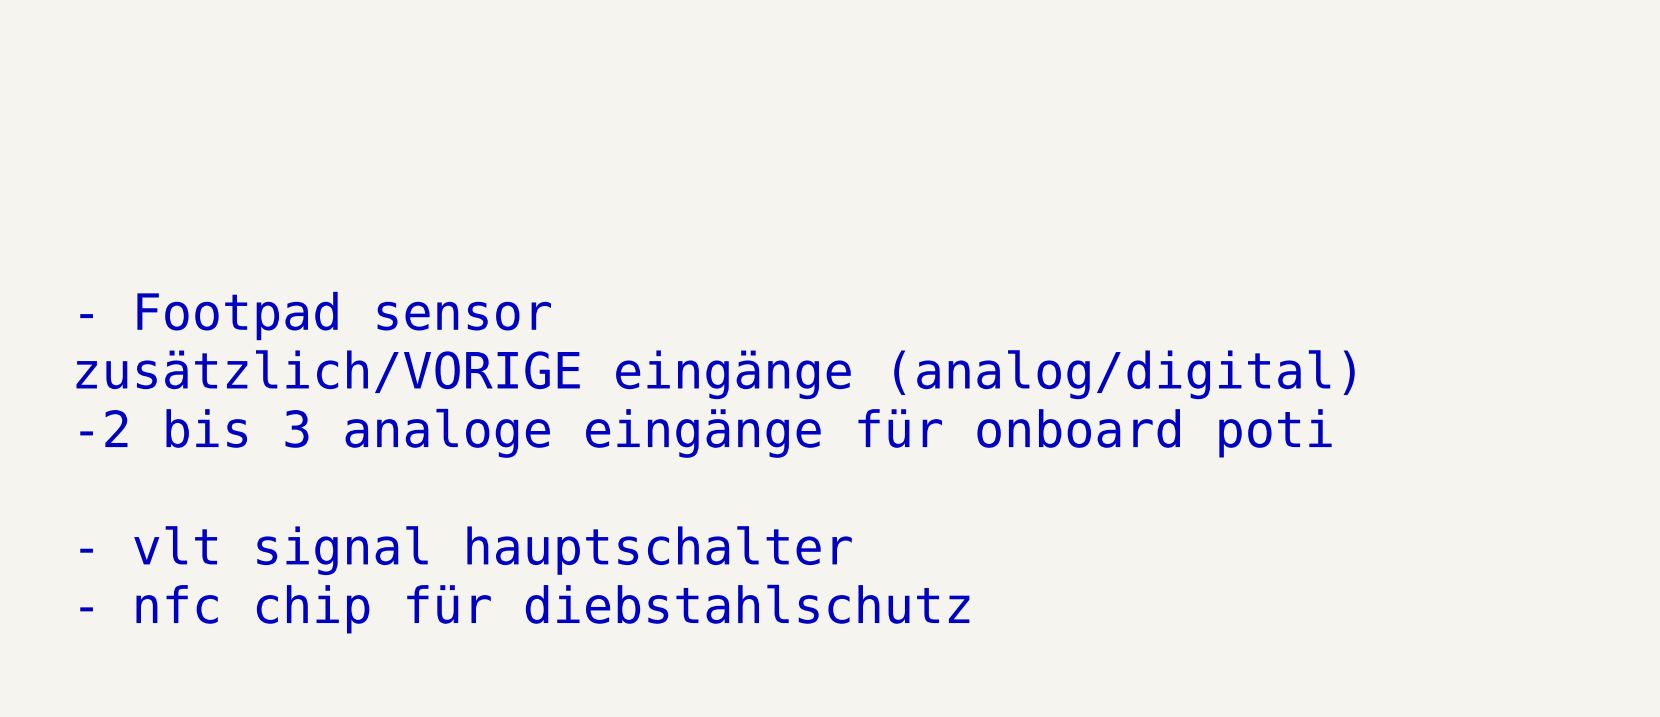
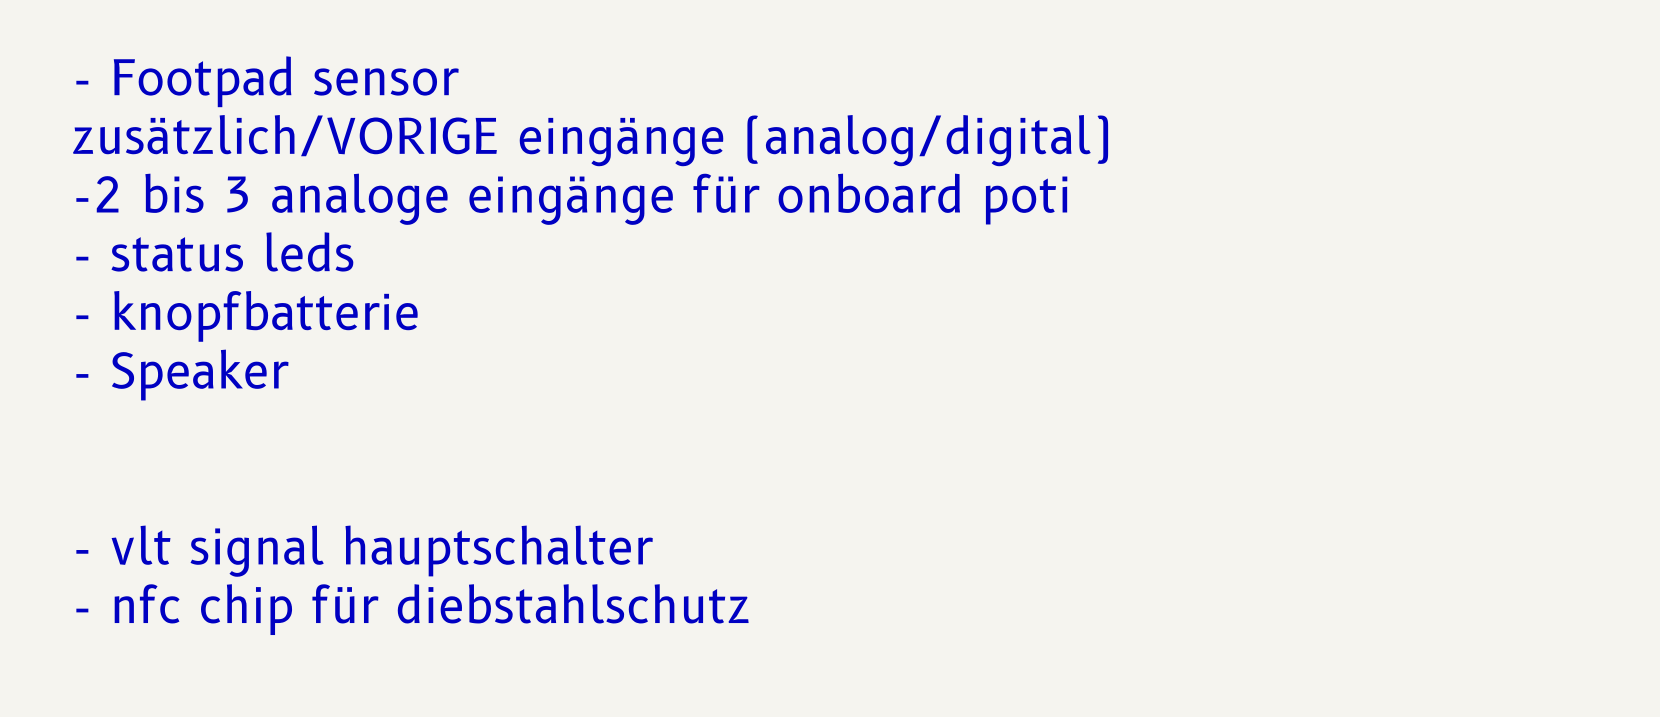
text: none -> - Footpad sensor (267, 81)
text: none -> zusätzlich/VORIGE eingänge (analog/digital) (590, 140)
text: none -> - status leds (214, 251)
text: - Footpad sensor (315, 316) -> - knopfbatterie (247, 316)
text: zusätzlich/VORIGE eingänge (analog/digital) (715, 374) -> - Speaker (182, 375)
text position: -2 bis 3 analoge eingänge für onboard poti (705, 433) -> -2 bis 3 analoge eingänge für onboard poti (571, 199)

